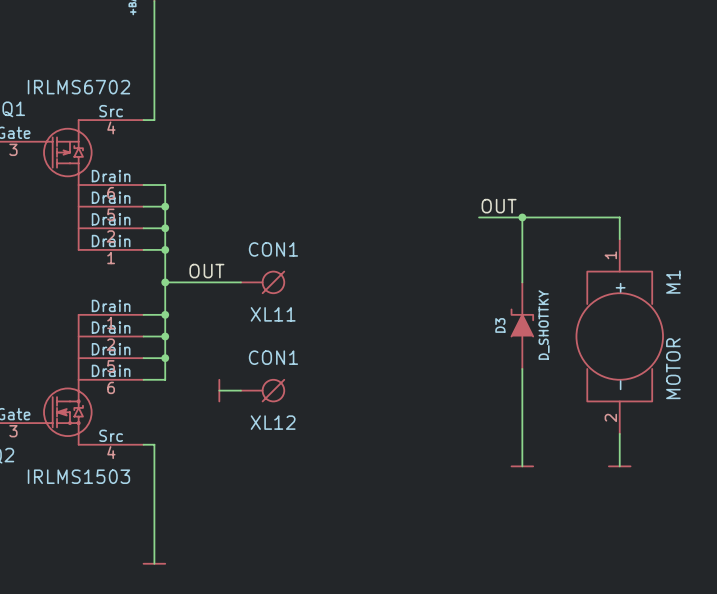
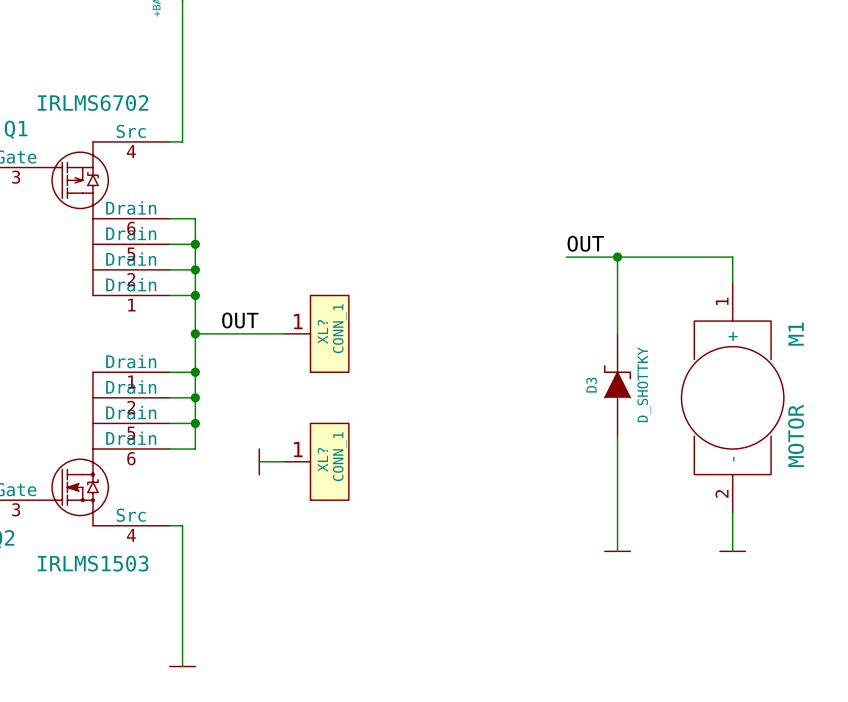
XL11: CON1 (262, 282) -> none
XL?: none -> CONN_1 (316, 333)
XL12: CON1 (262, 390) -> none
XL?: none -> CONN_1 (316, 461)

